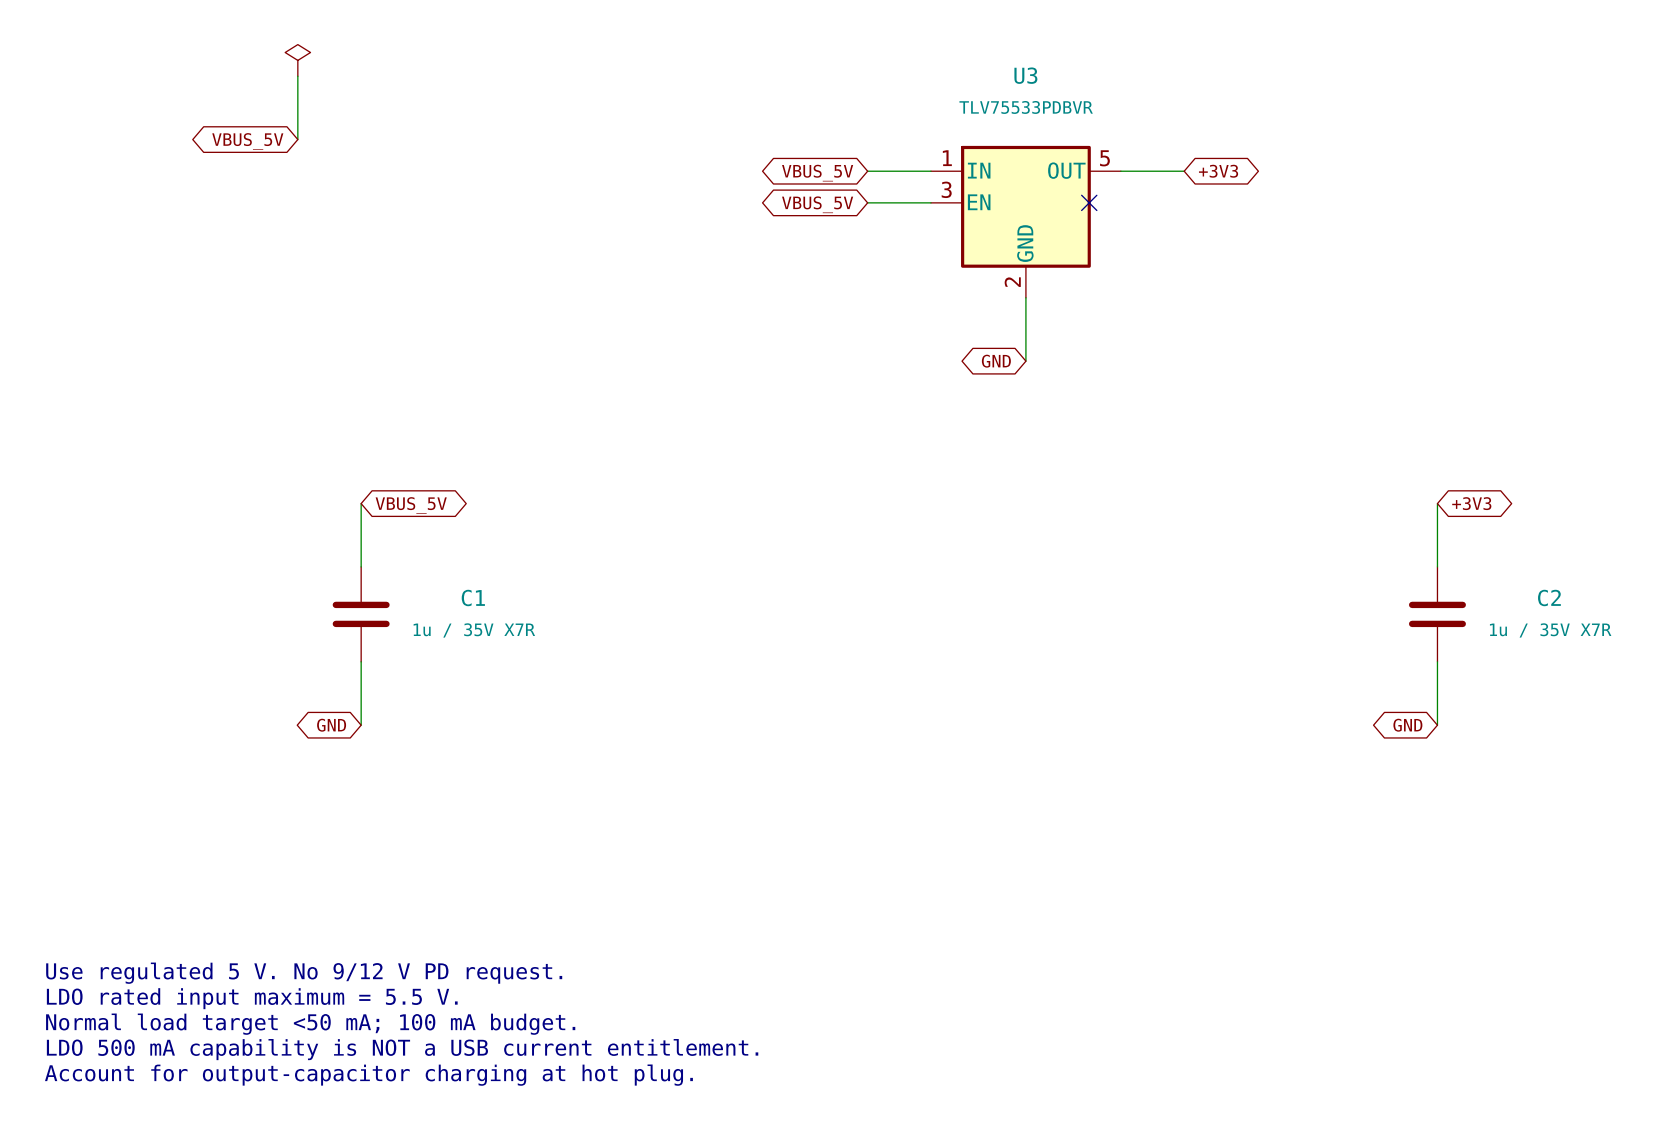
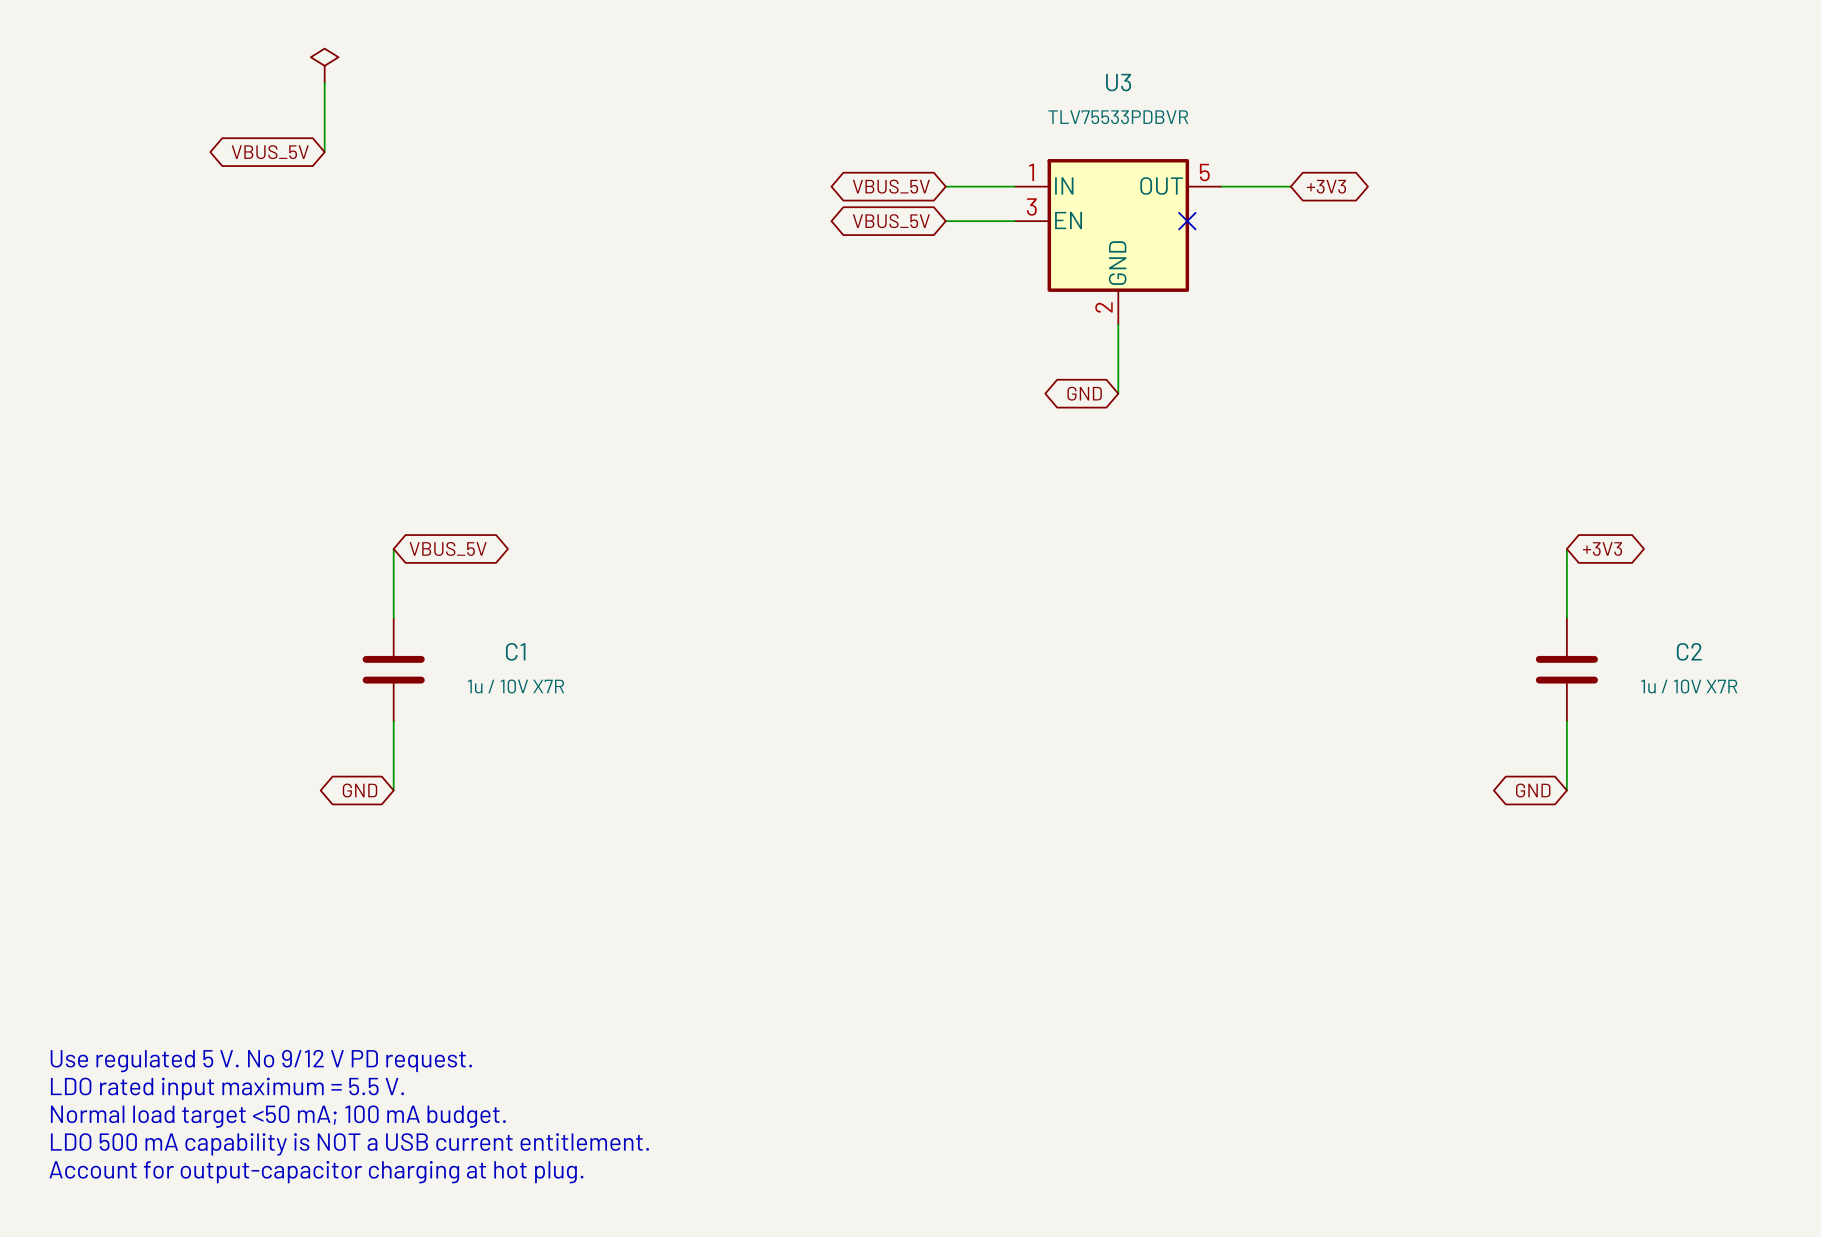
C1 value: 1u / 35V X7R (474, 630) -> 1u / 10V X7R (516, 686)
C2 value: 1u / 35V X7R (1550, 630) -> 1u / 10V X7R (1689, 686)

